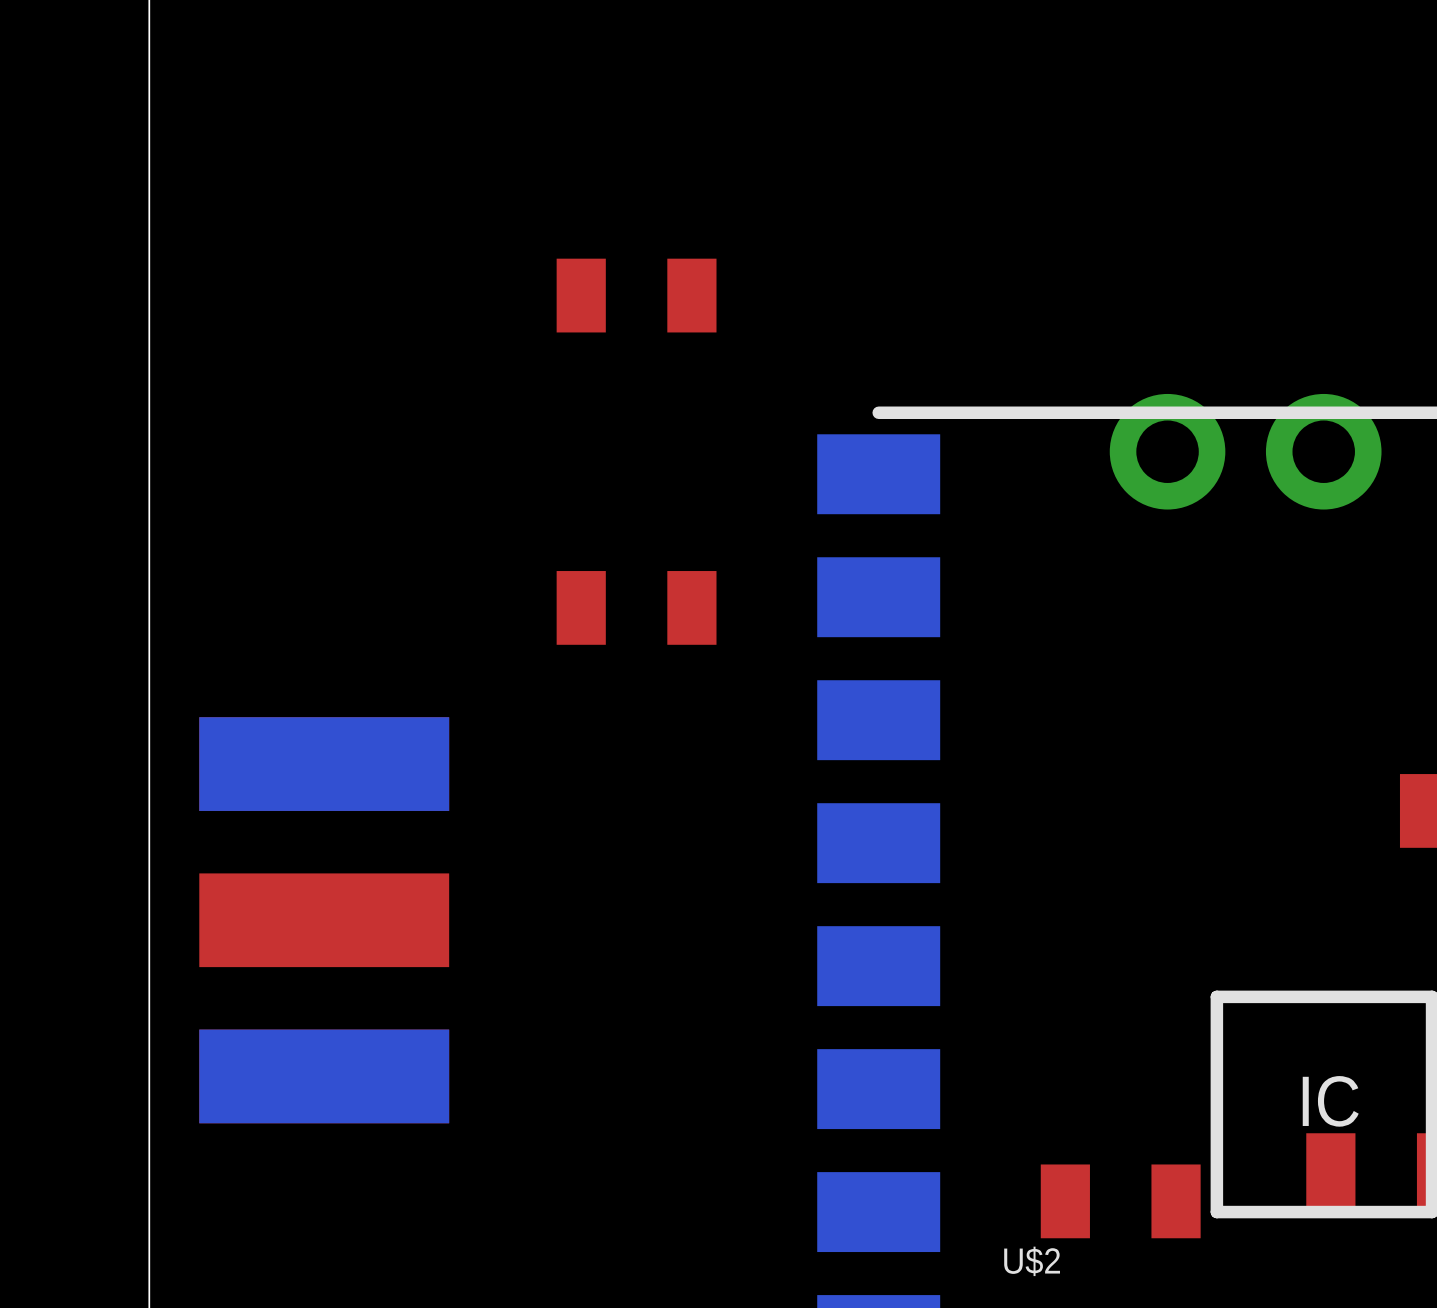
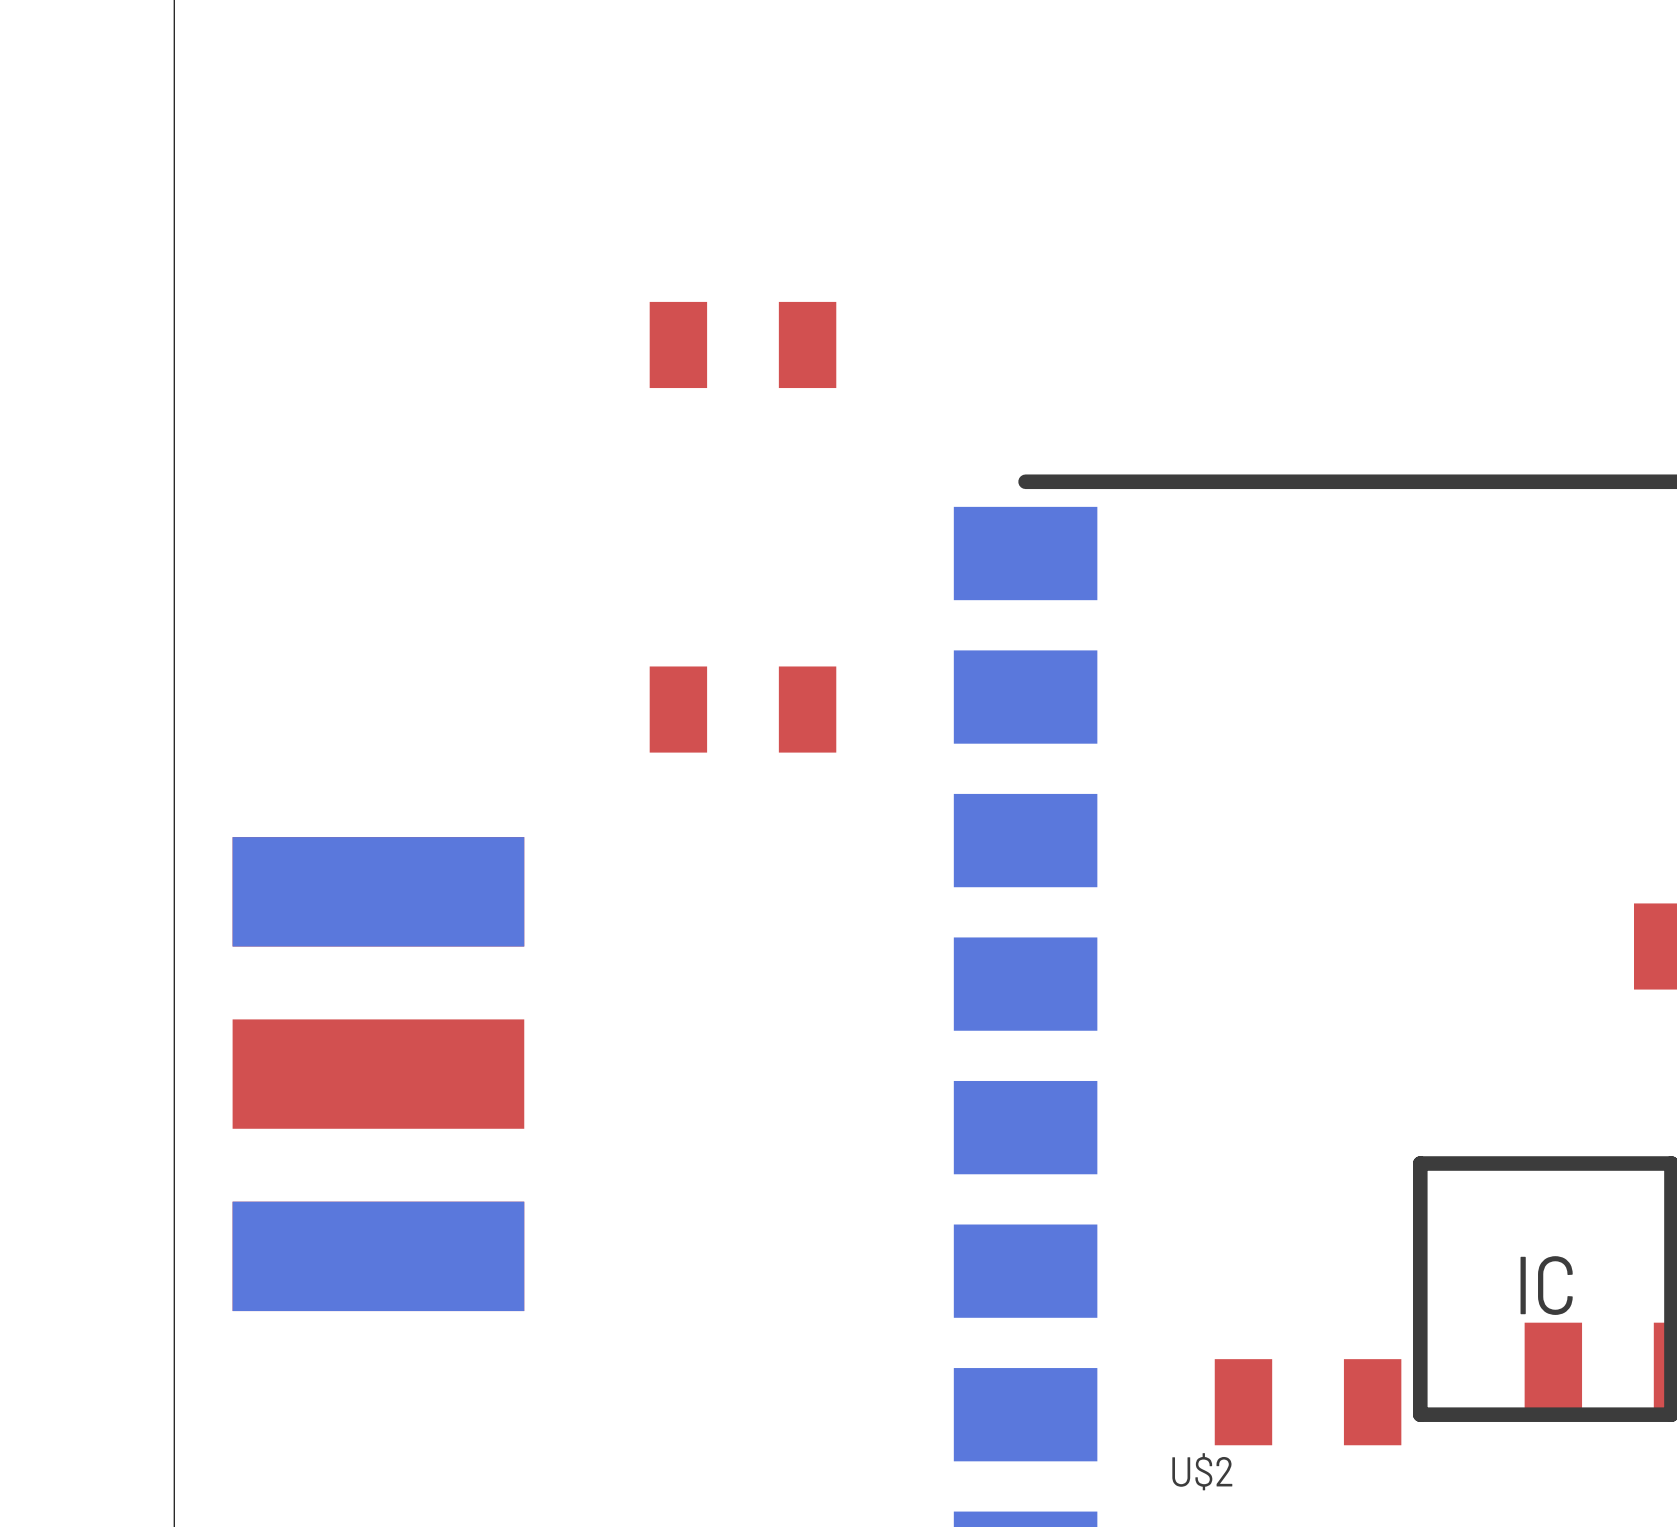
part: (1245, 451) -> none

